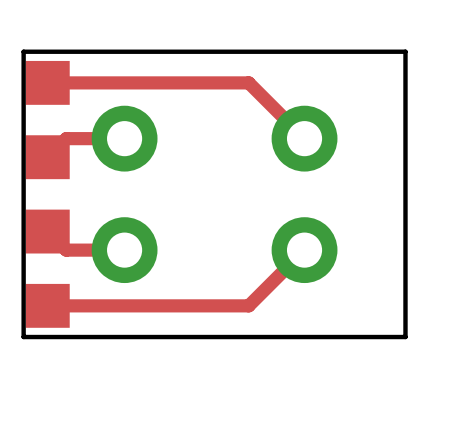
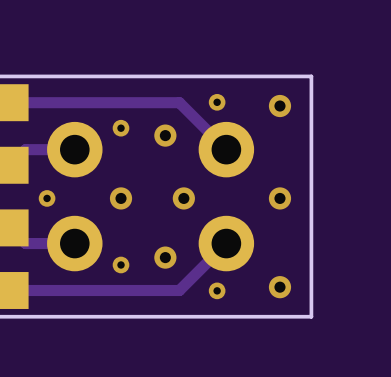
via: none -> (217, 102)
via: none -> (279, 106)
via: none -> (121, 128)
via: none -> (165, 135)
via: none -> (47, 198)
via: none -> (121, 198)
via: none -> (183, 198)
via: none -> (279, 198)
via: none -> (165, 257)
via: none -> (121, 264)
via: none -> (279, 287)
via: none -> (217, 290)

